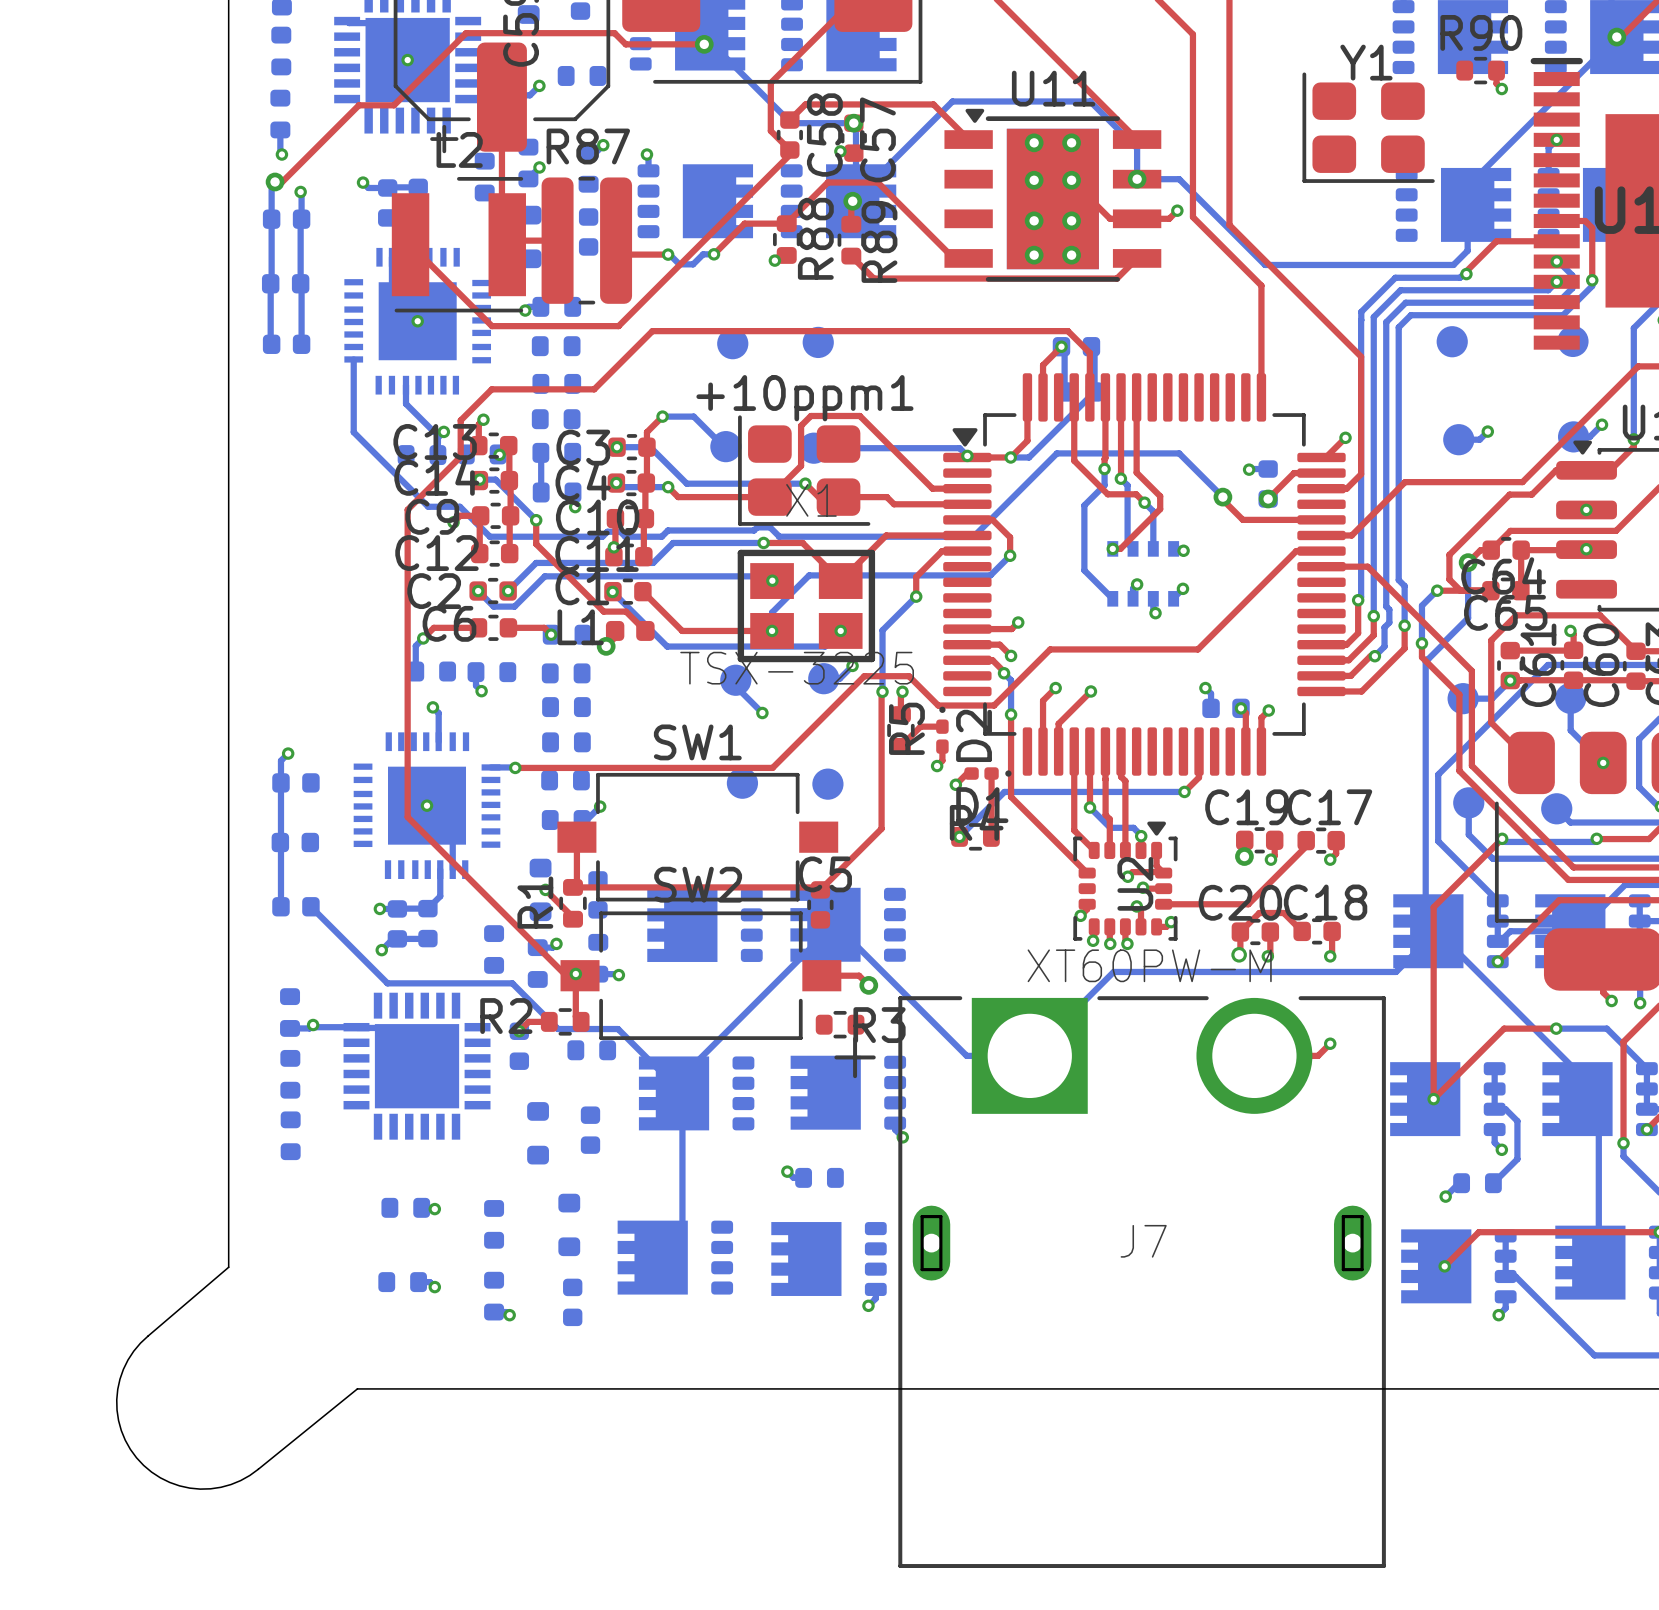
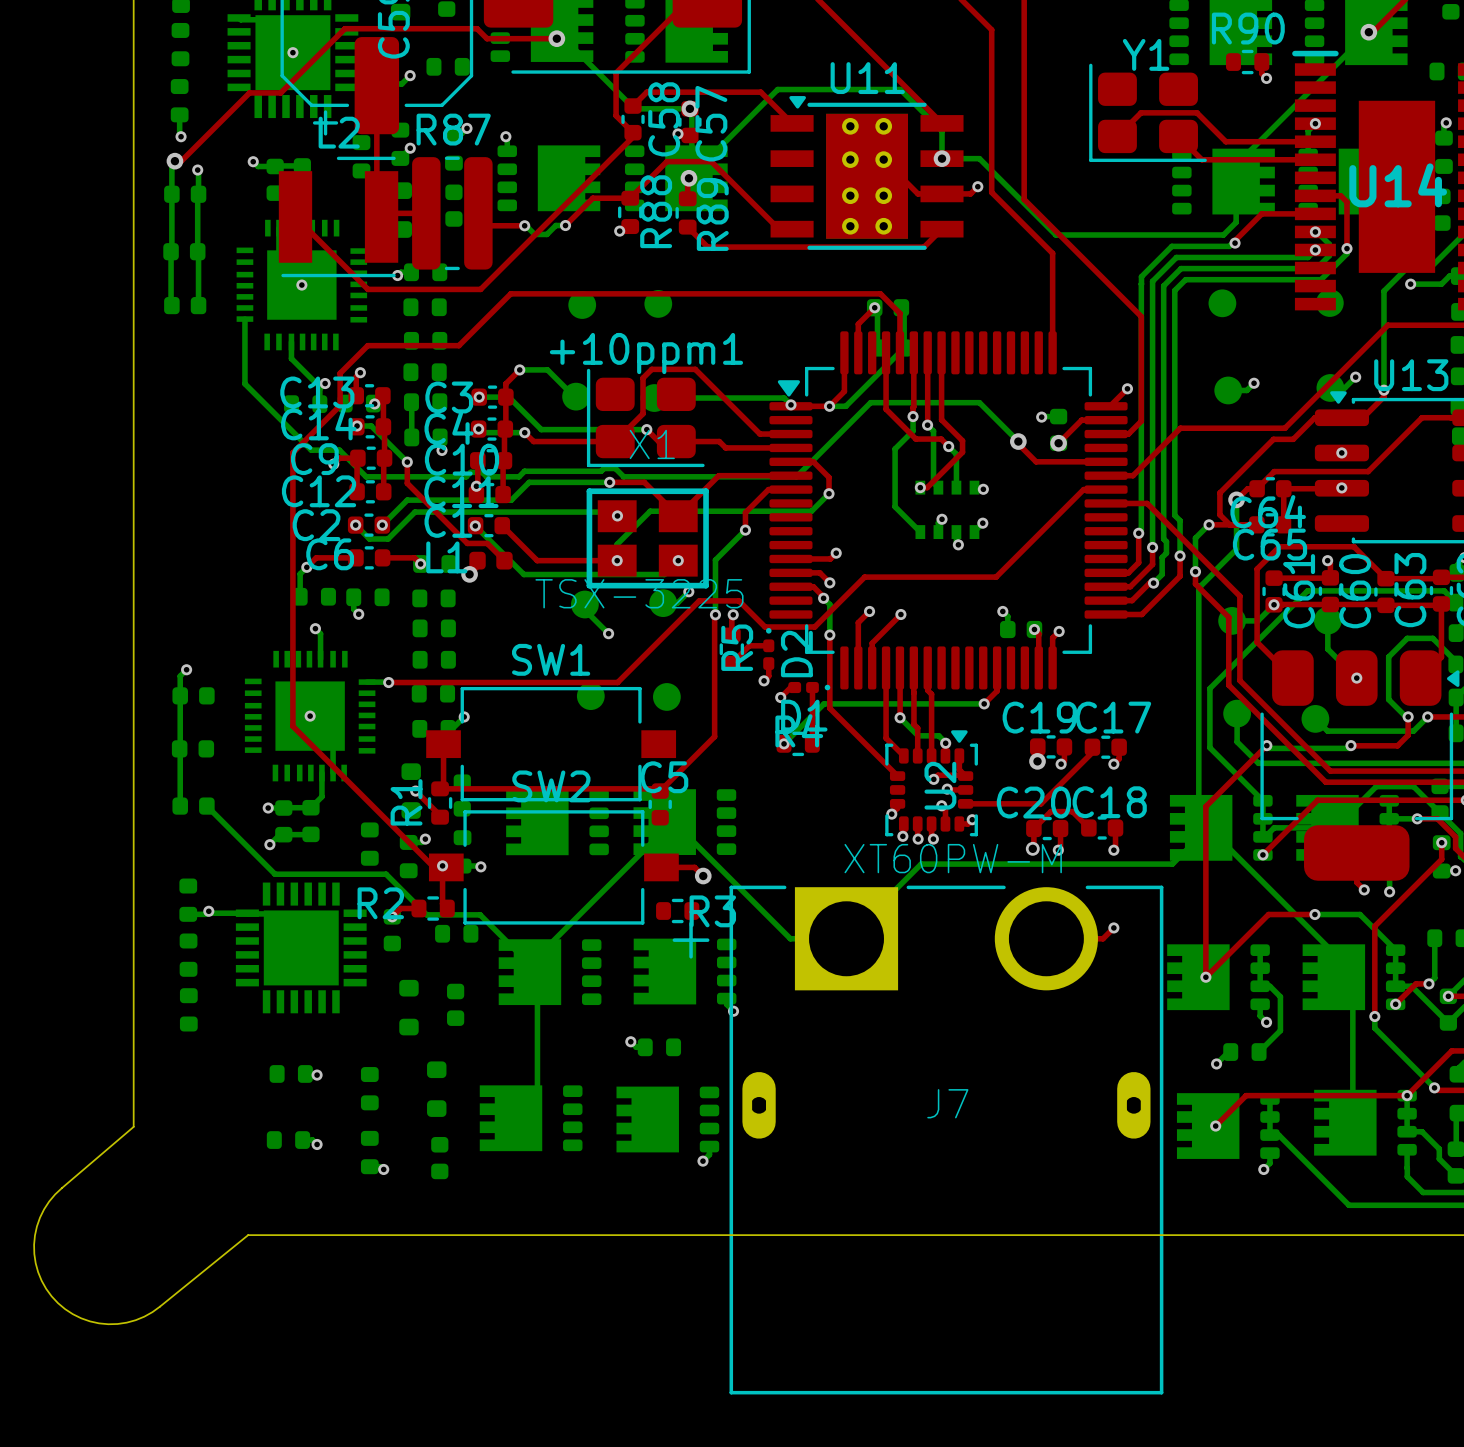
top track: none -> (1117, 136) (1141, 112) (1196, 112) (1225, 141) (1315, 141)
top track: none -> (1178, 136) (1201, 159) (1315, 159)

